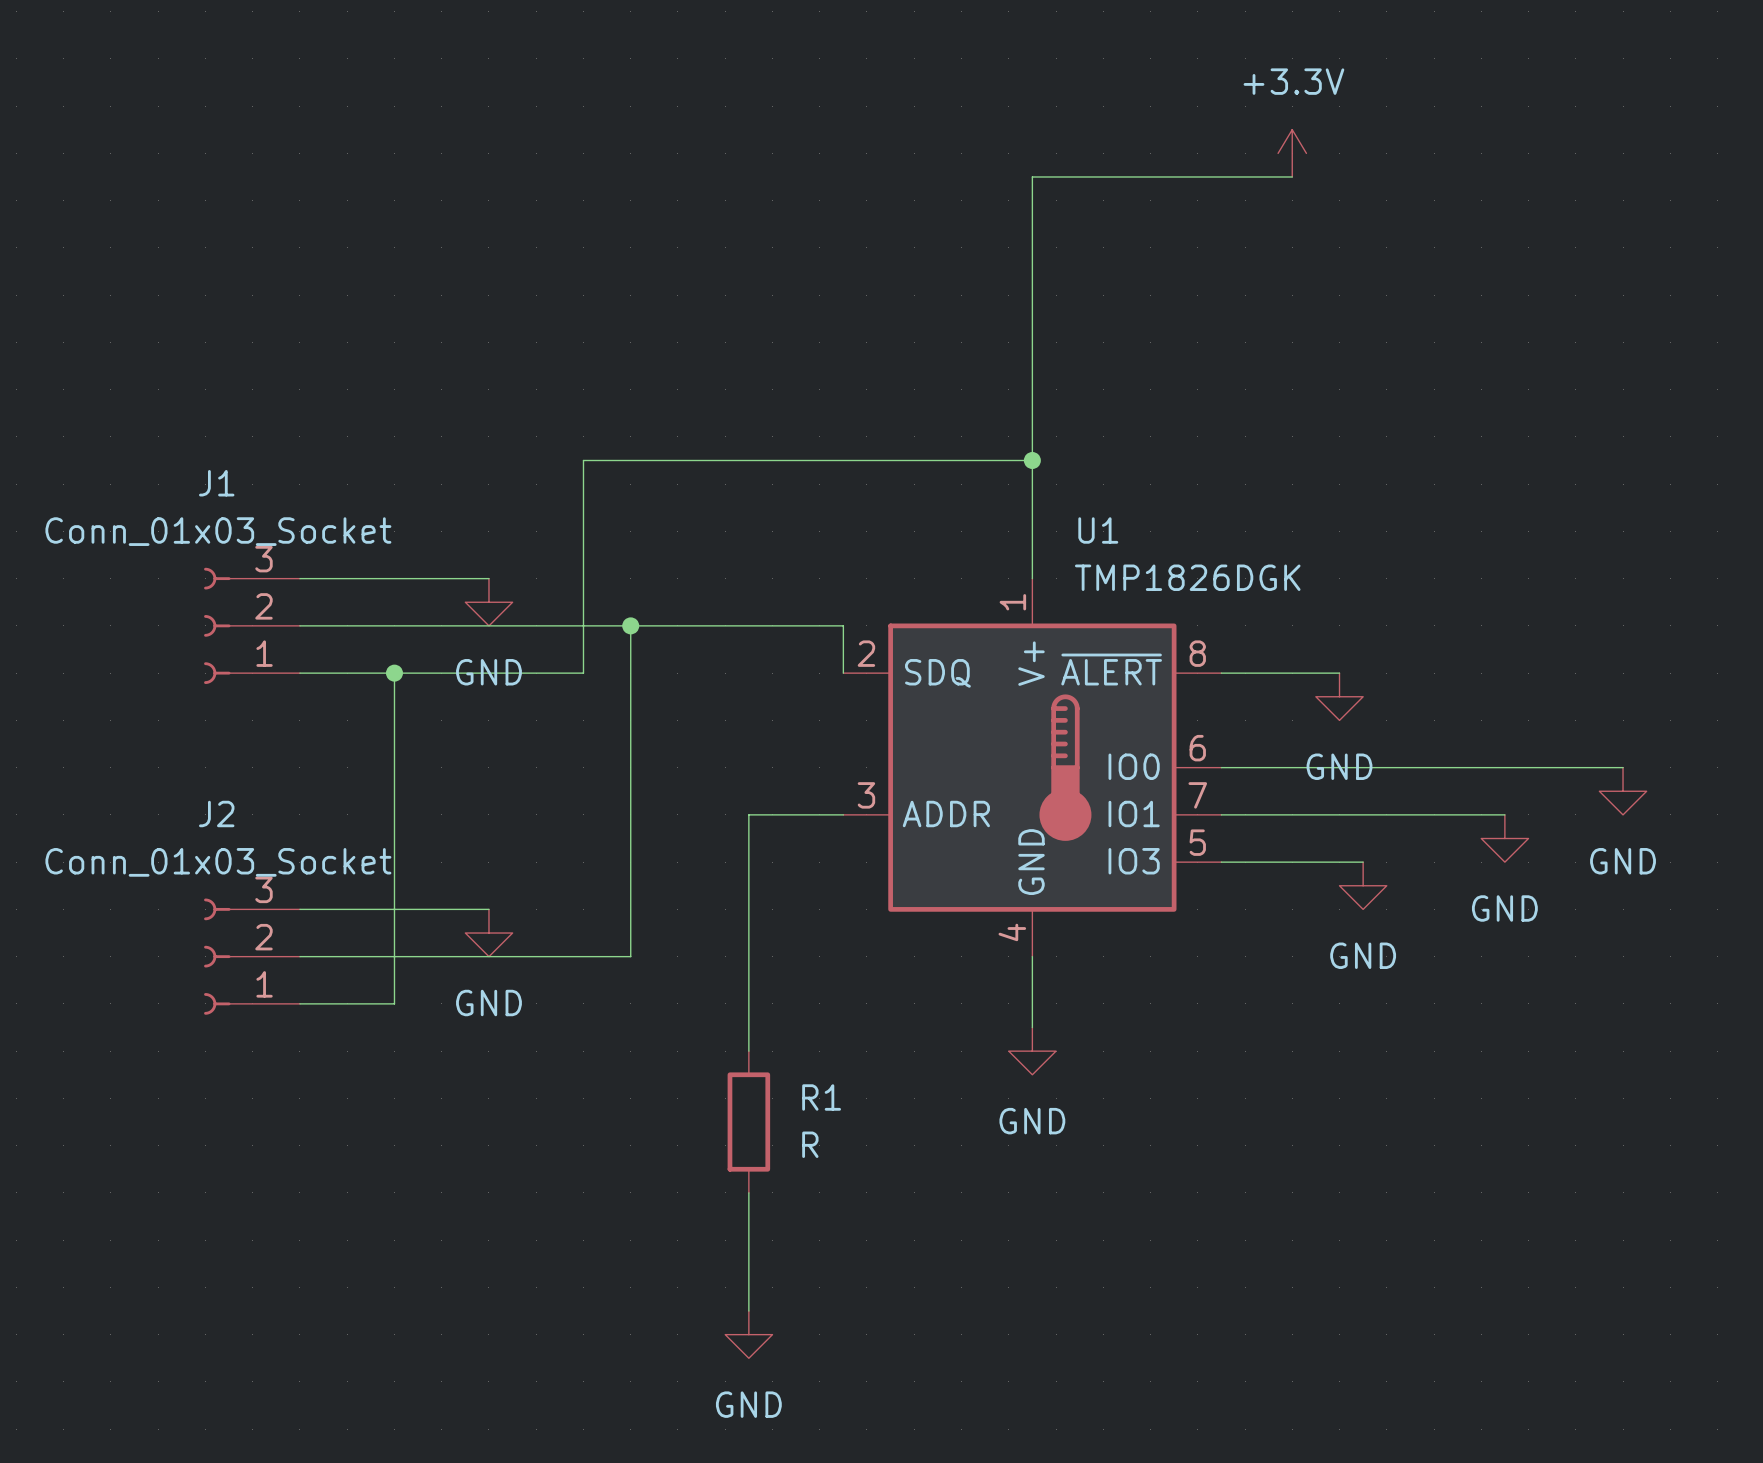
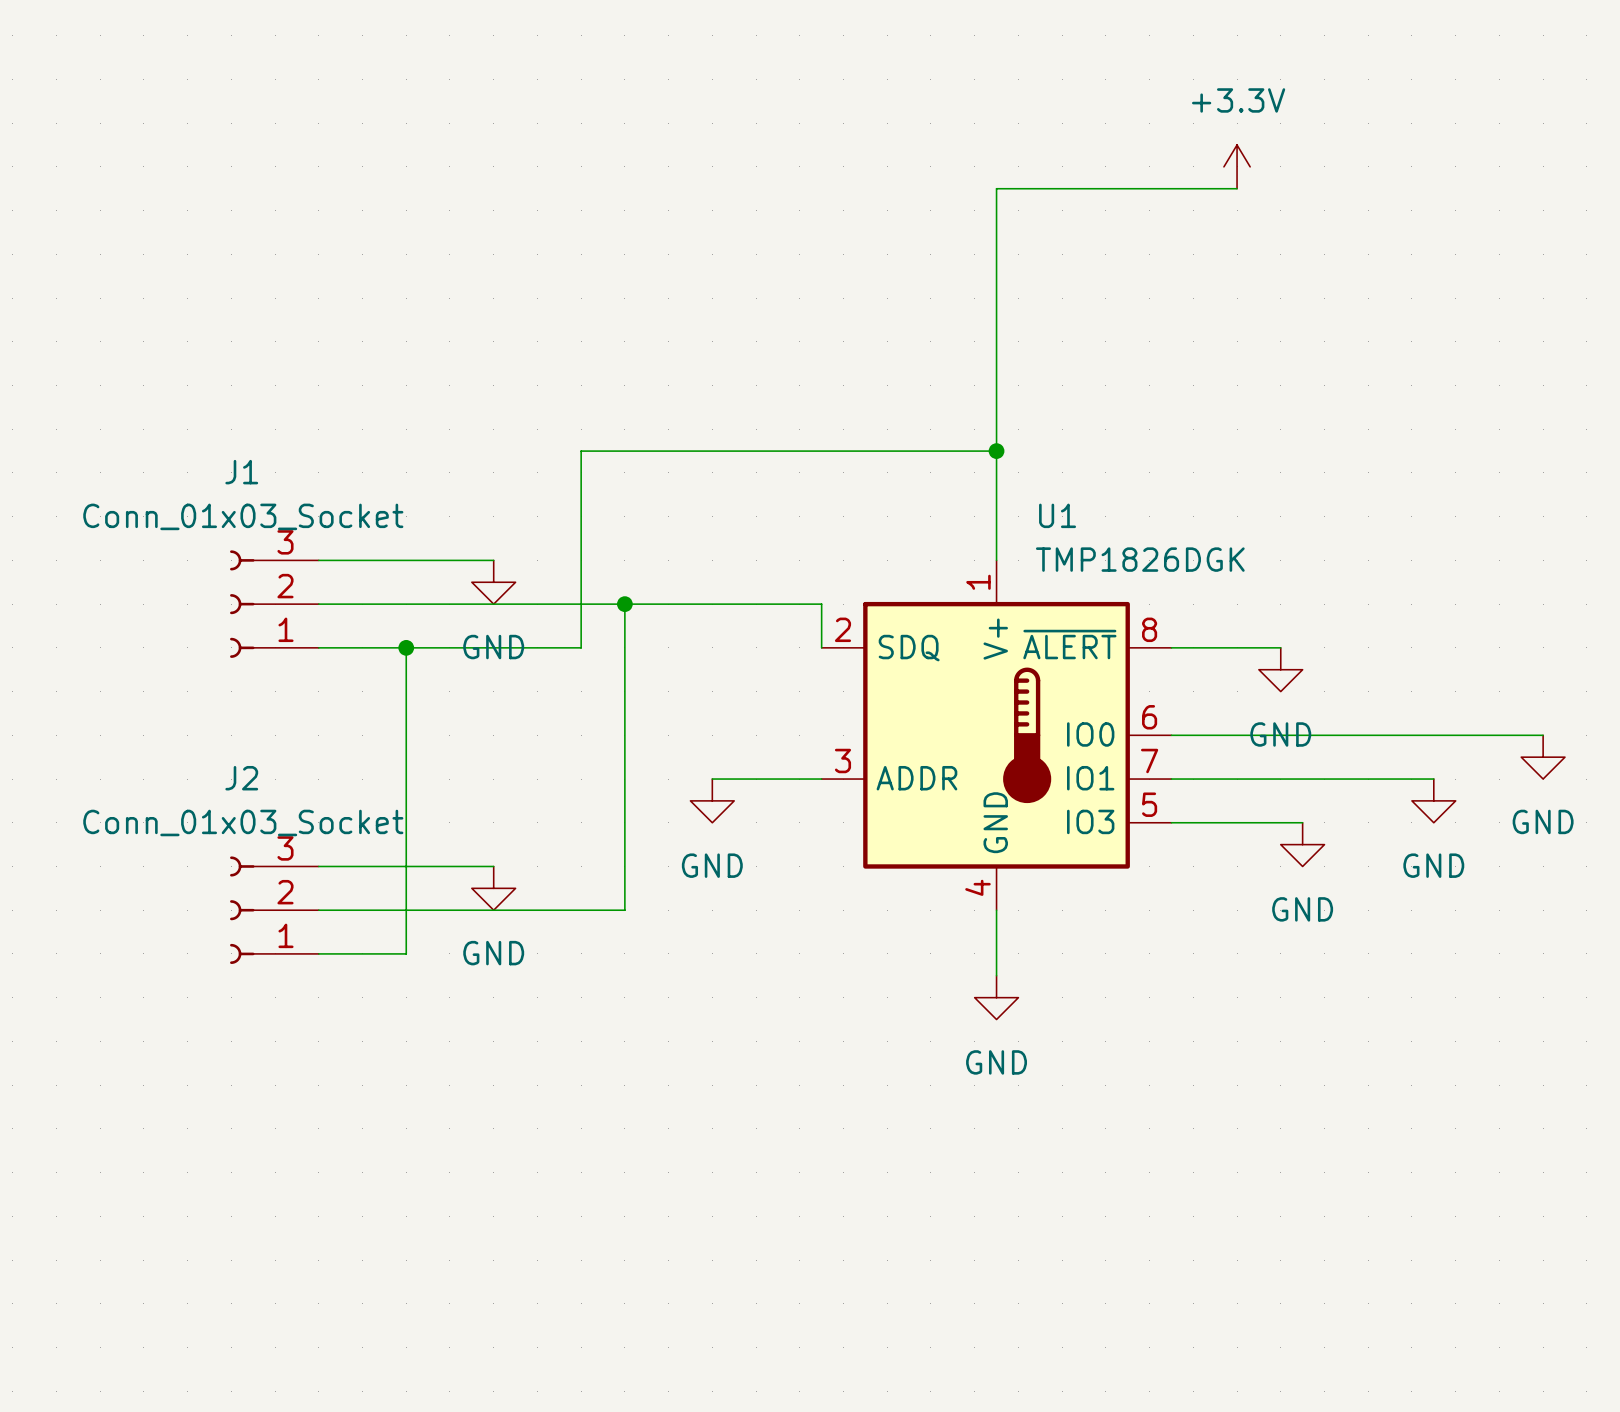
wire: (748, 814) (748, 1051) -> (734, 779) (712, 779)
power symbol: none -> GND (712, 800)
R1: R (748, 1122) -> none
wire: (748, 1192) (748, 1311) -> none
power symbol: GND (748, 1334) -> none

